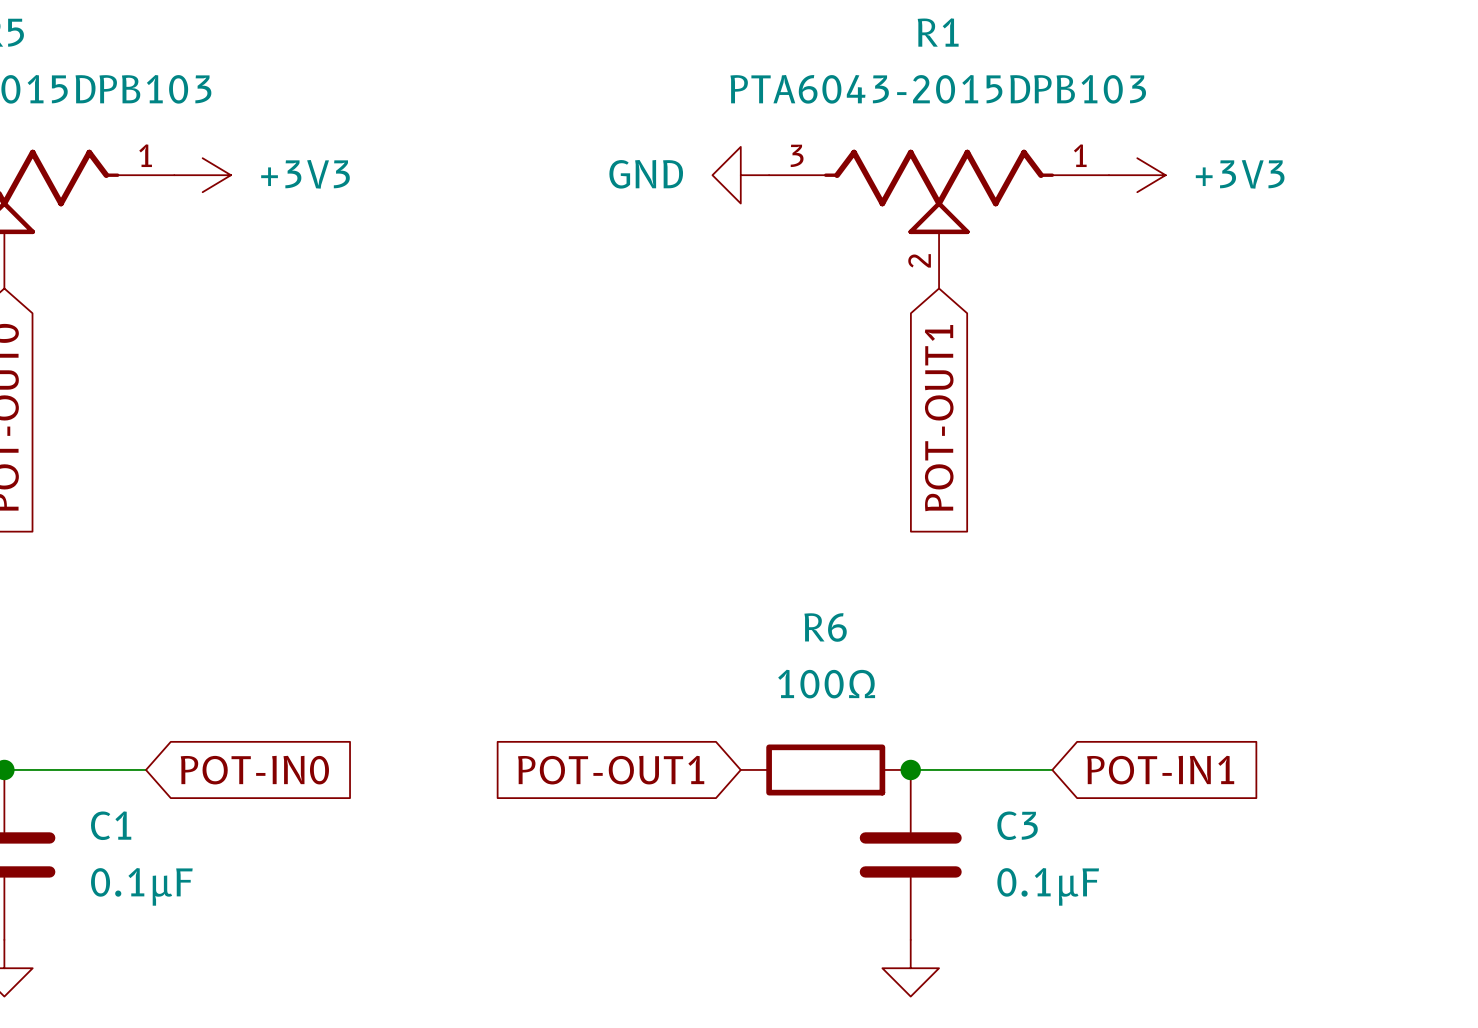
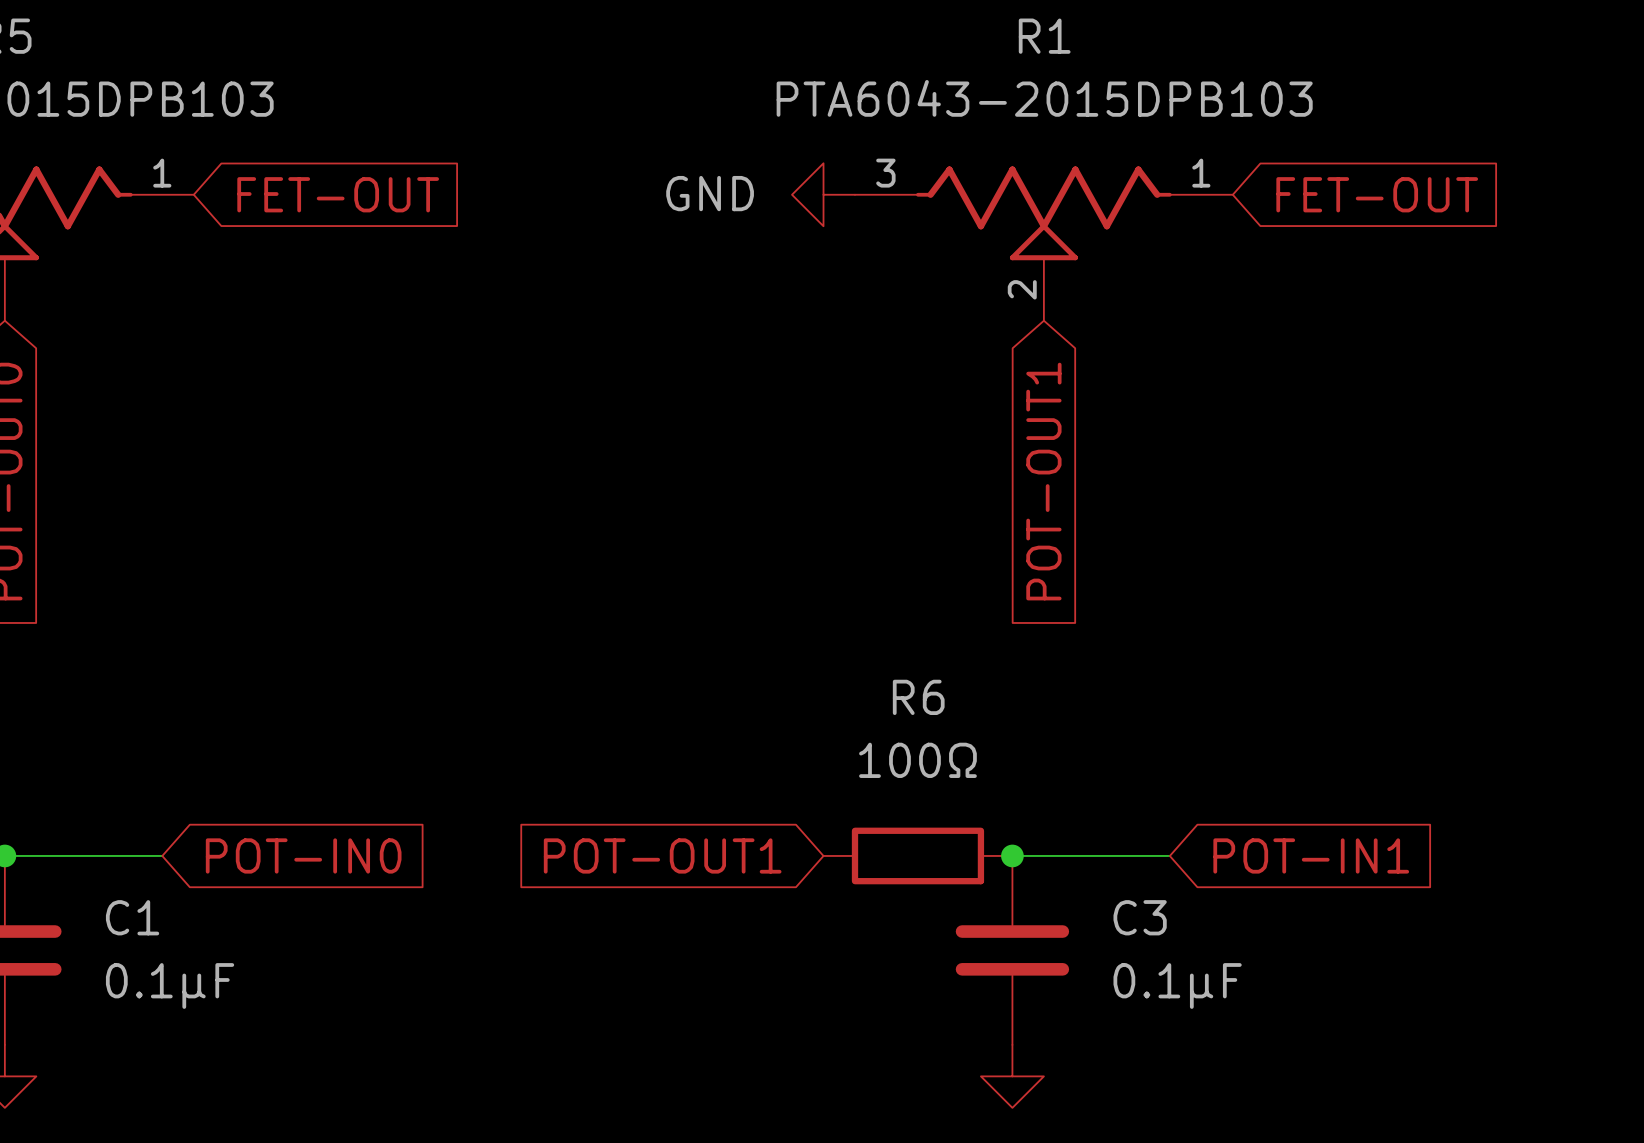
power symbol: +3V3 (202, 175) -> none
global label: none -> FET-OUT (338, 194)
power symbol: +3V3 (1137, 175) -> none
global label: none -> FET-OUT (1377, 194)

